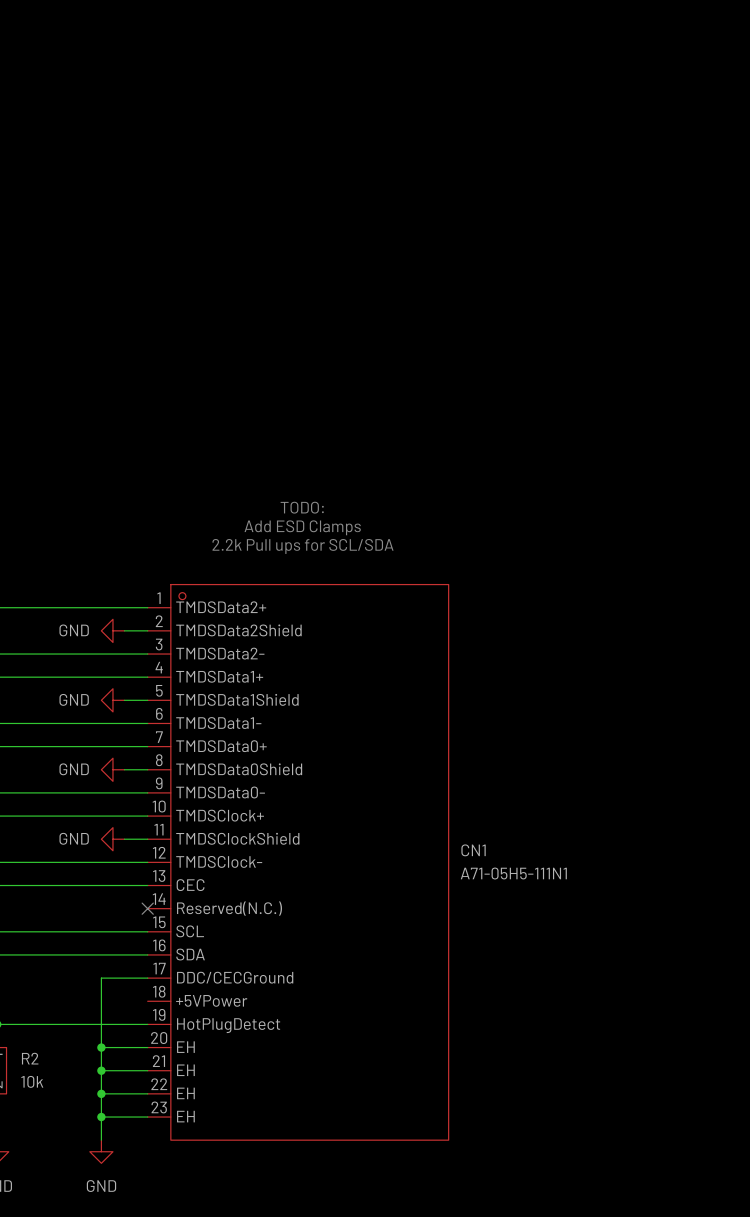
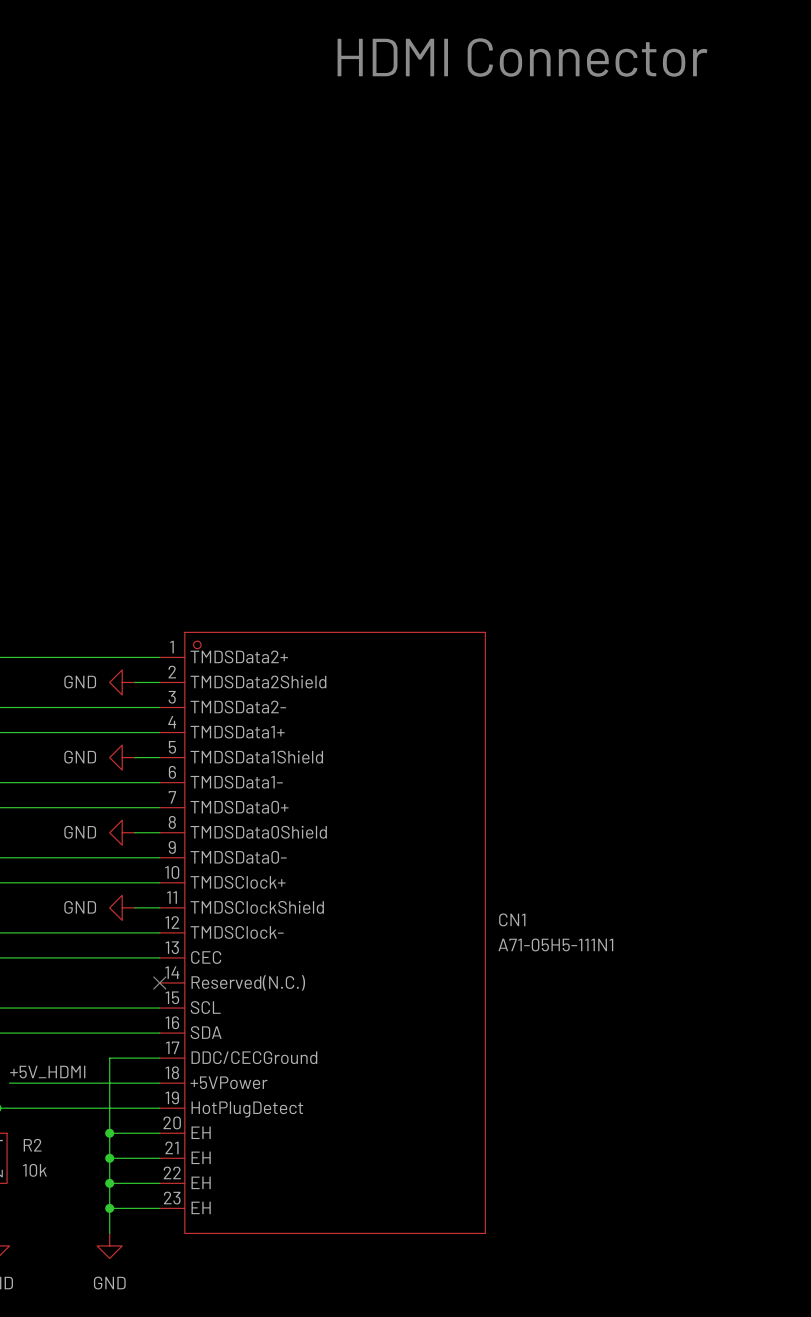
text: none -> HDMI Connector (522, 57)
text: TODO: (302, 507) -> none
text: Add ESD Clamps (302, 527) -> none
text: 2.2k Pull ups for SCL/SDA (302, 546) -> none
label: none -> +5V_HDMI (47, 1072)
wire: none -> (9, 1083) (159, 1083)

